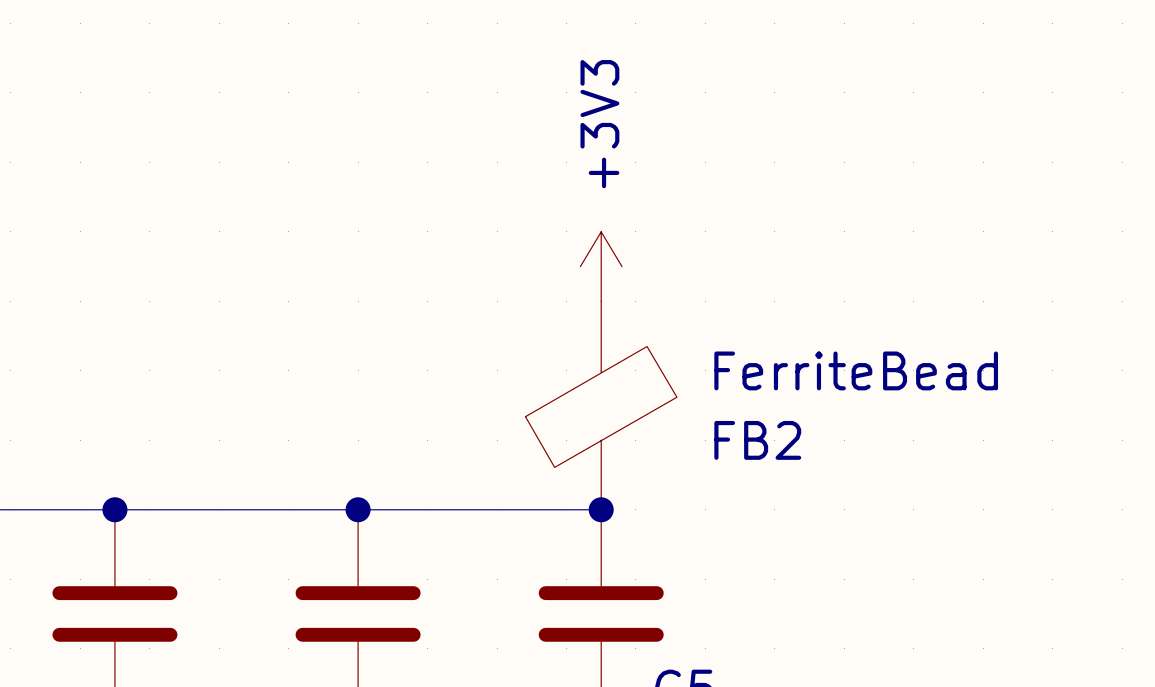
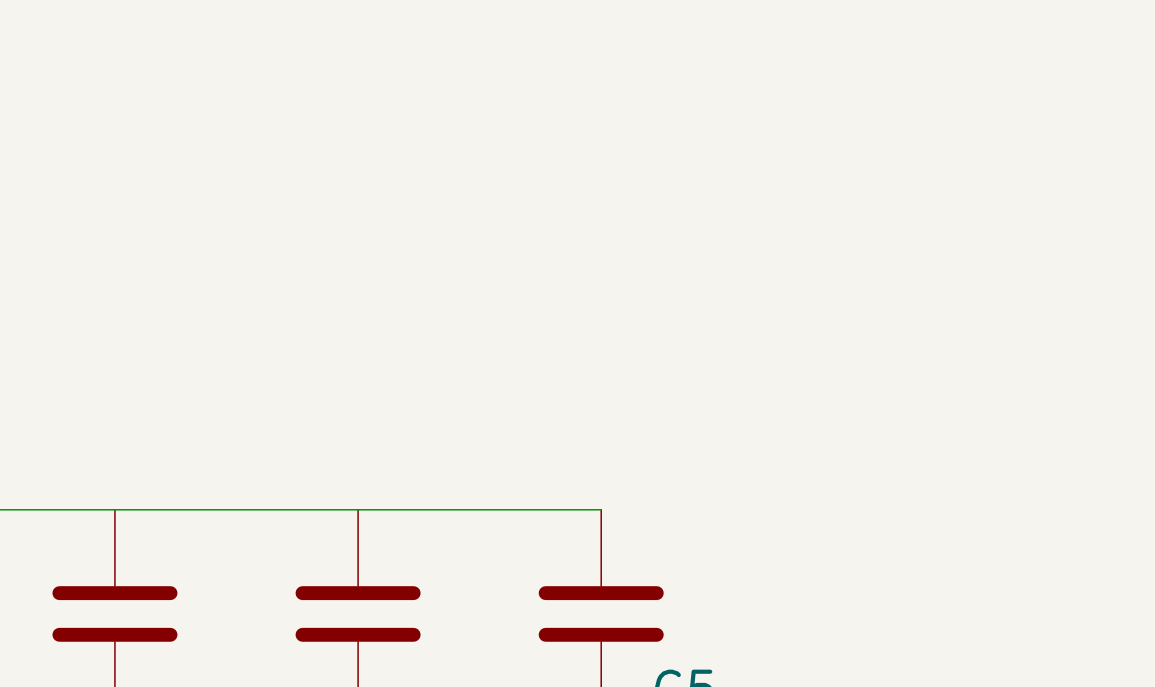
power symbol: +3V3 (601, 266) -> none
FB2: FerriteBead (601, 405) -> none
junction: (114, 509) -> none
junction: (358, 509) -> none
junction: (601, 509) -> none

